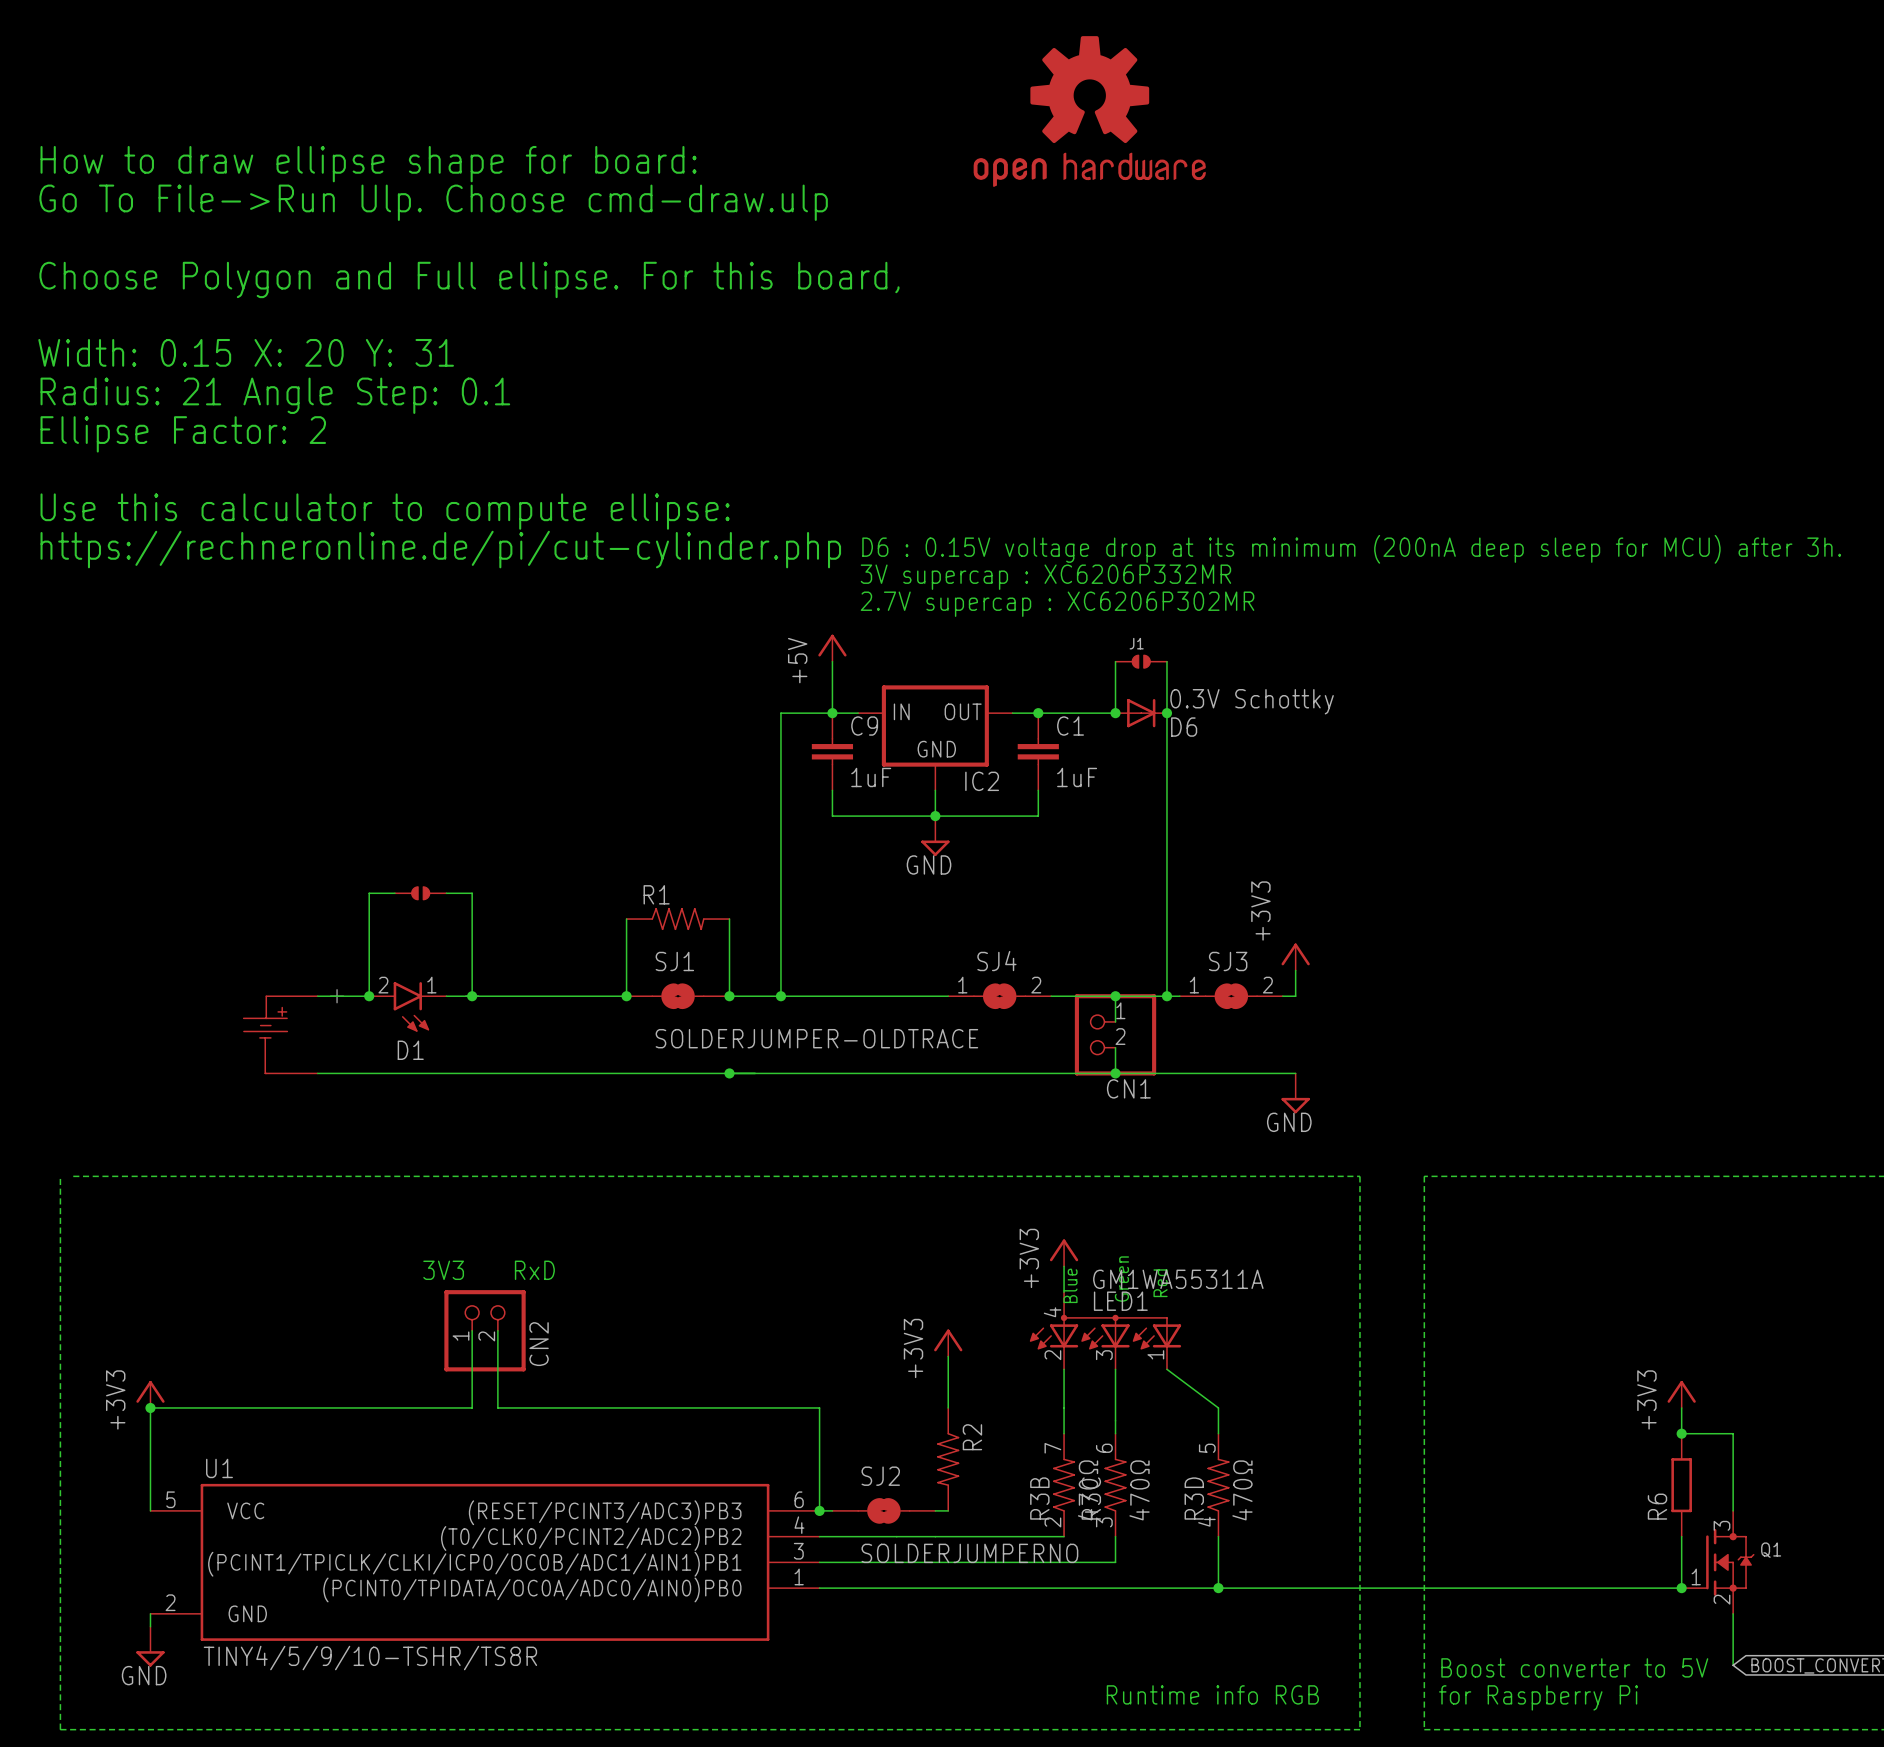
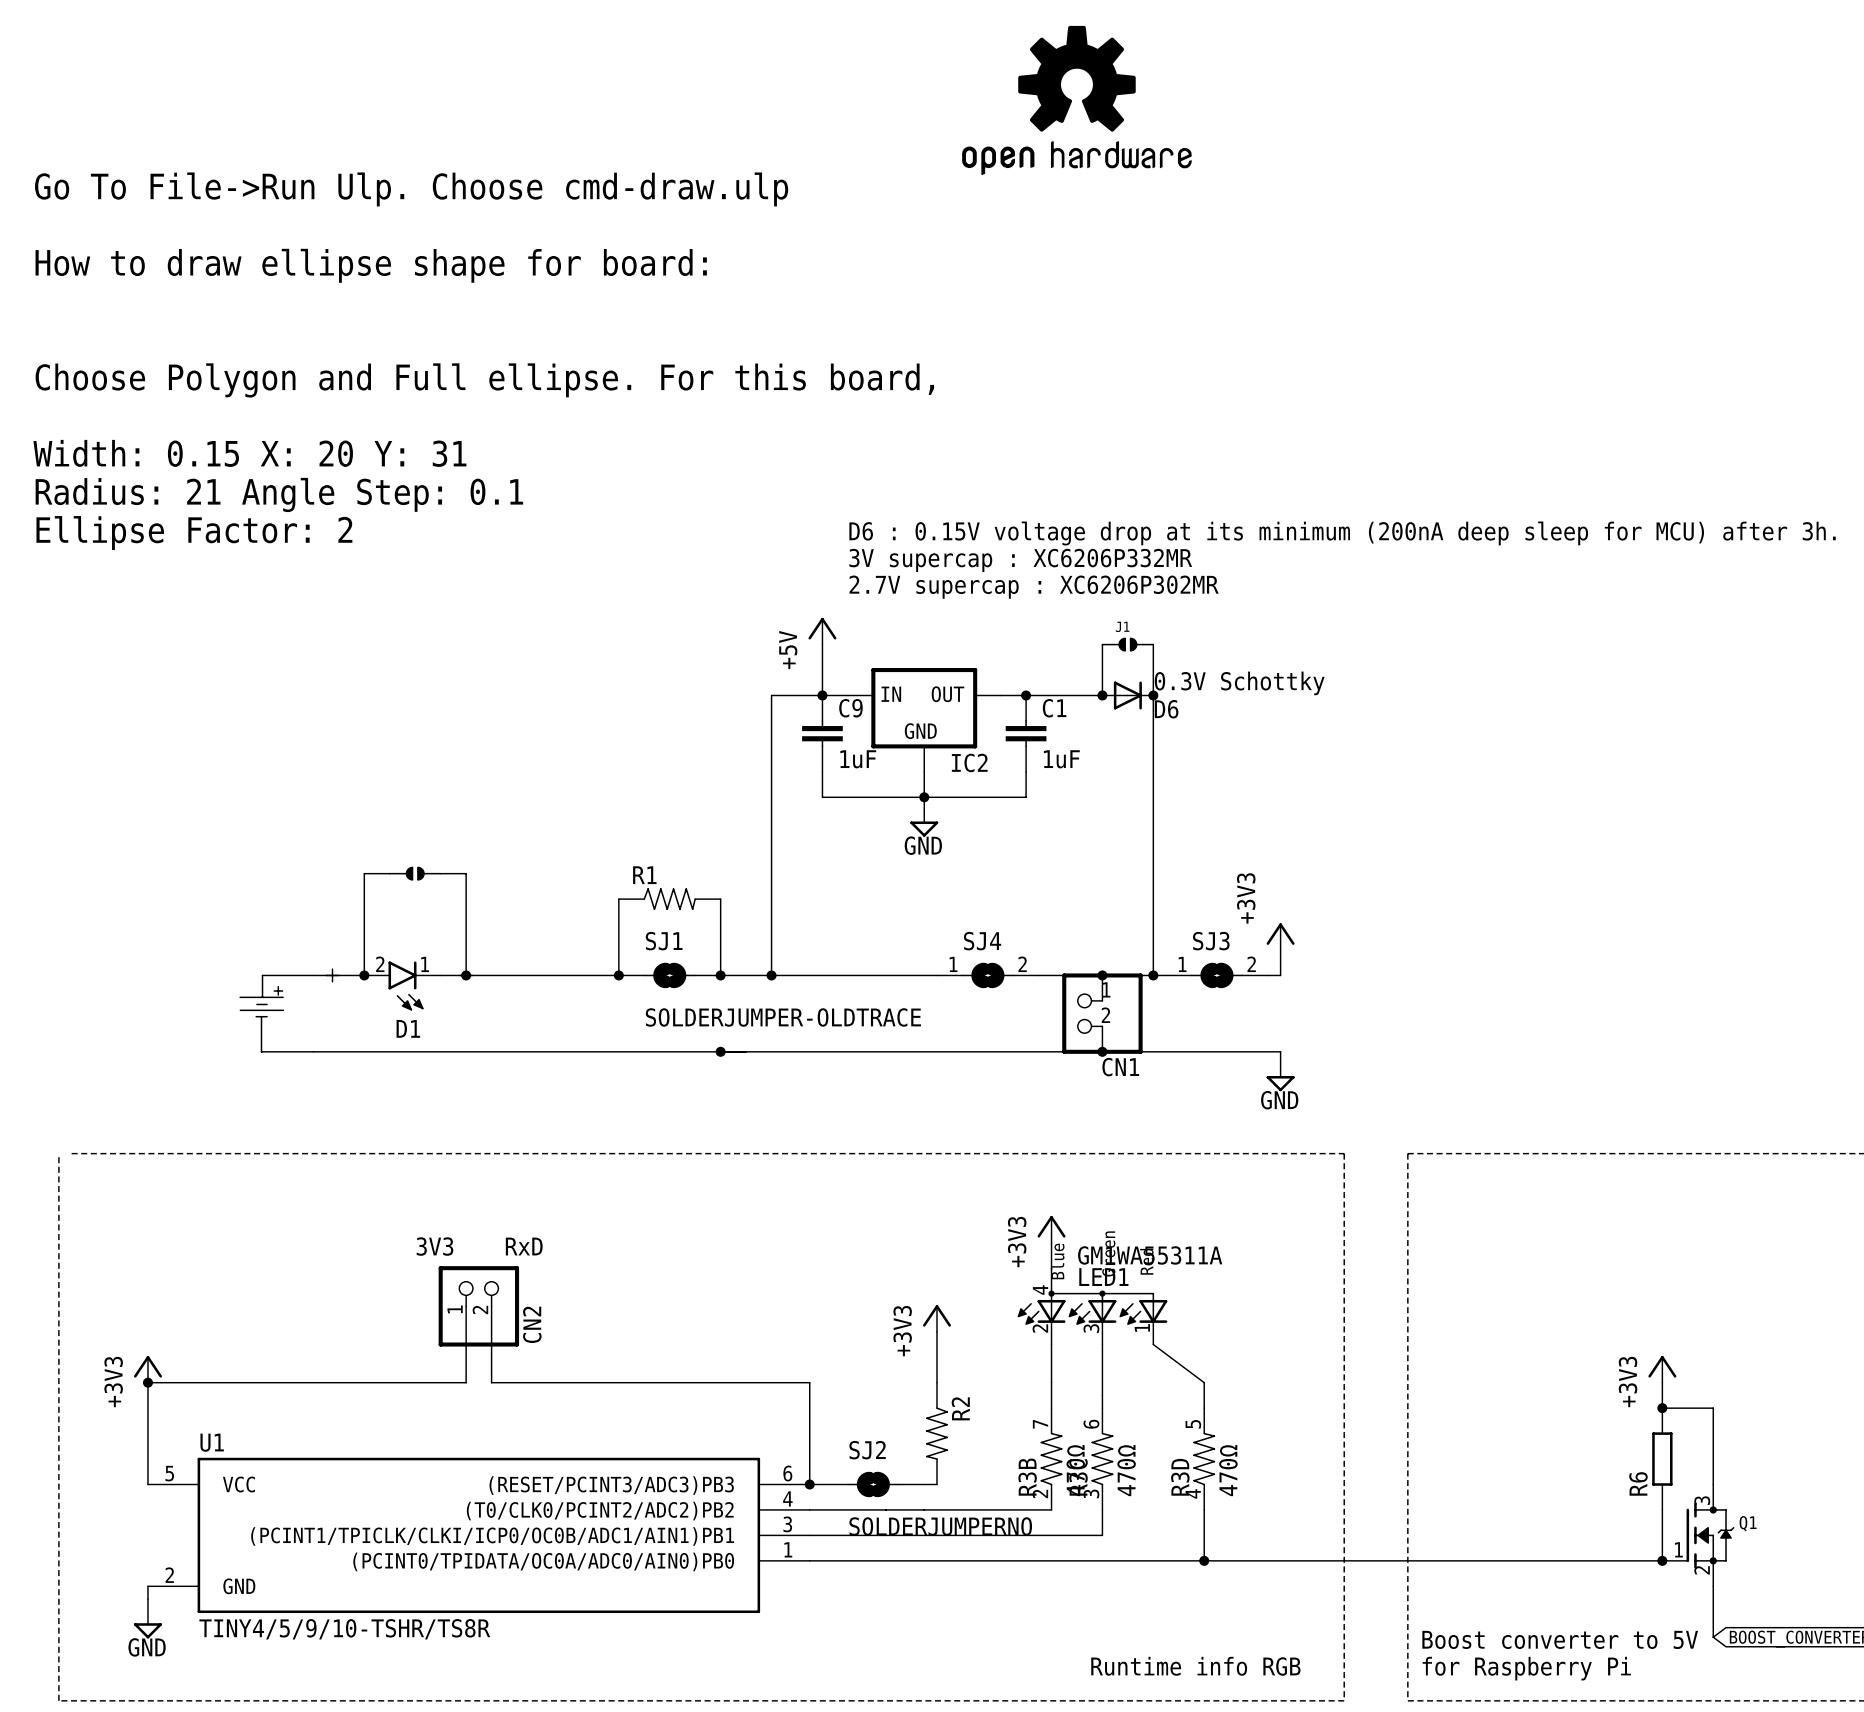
text: How to draw ellipse shape for board: (368, 164) -> none
text: Choose Polygon and Full ellipse. For this board, (469, 279) -> How to draw ellipse shape for board: (371, 265)
text position: Width: 0.15 X: 20 Y: 31 (246, 352) -> Width: 0.15 X: 20 Y: 31 (249, 453)
text: Radius: 21 Angle Step: 0.1 (275, 395) -> Choose Polygon and Full ellipse. For this board, (484, 380)
text: Ellipse Factor: 2 (183, 434) -> none
text: Use this calculator to compute ellipse: (385, 511) -> Radius: 21 Angle Step: 0.1 (279, 495)
text: https://rechneronline.de/pi/cut-cylinder.php (440, 549) -> Ellipse Factor: 2 (194, 533)

